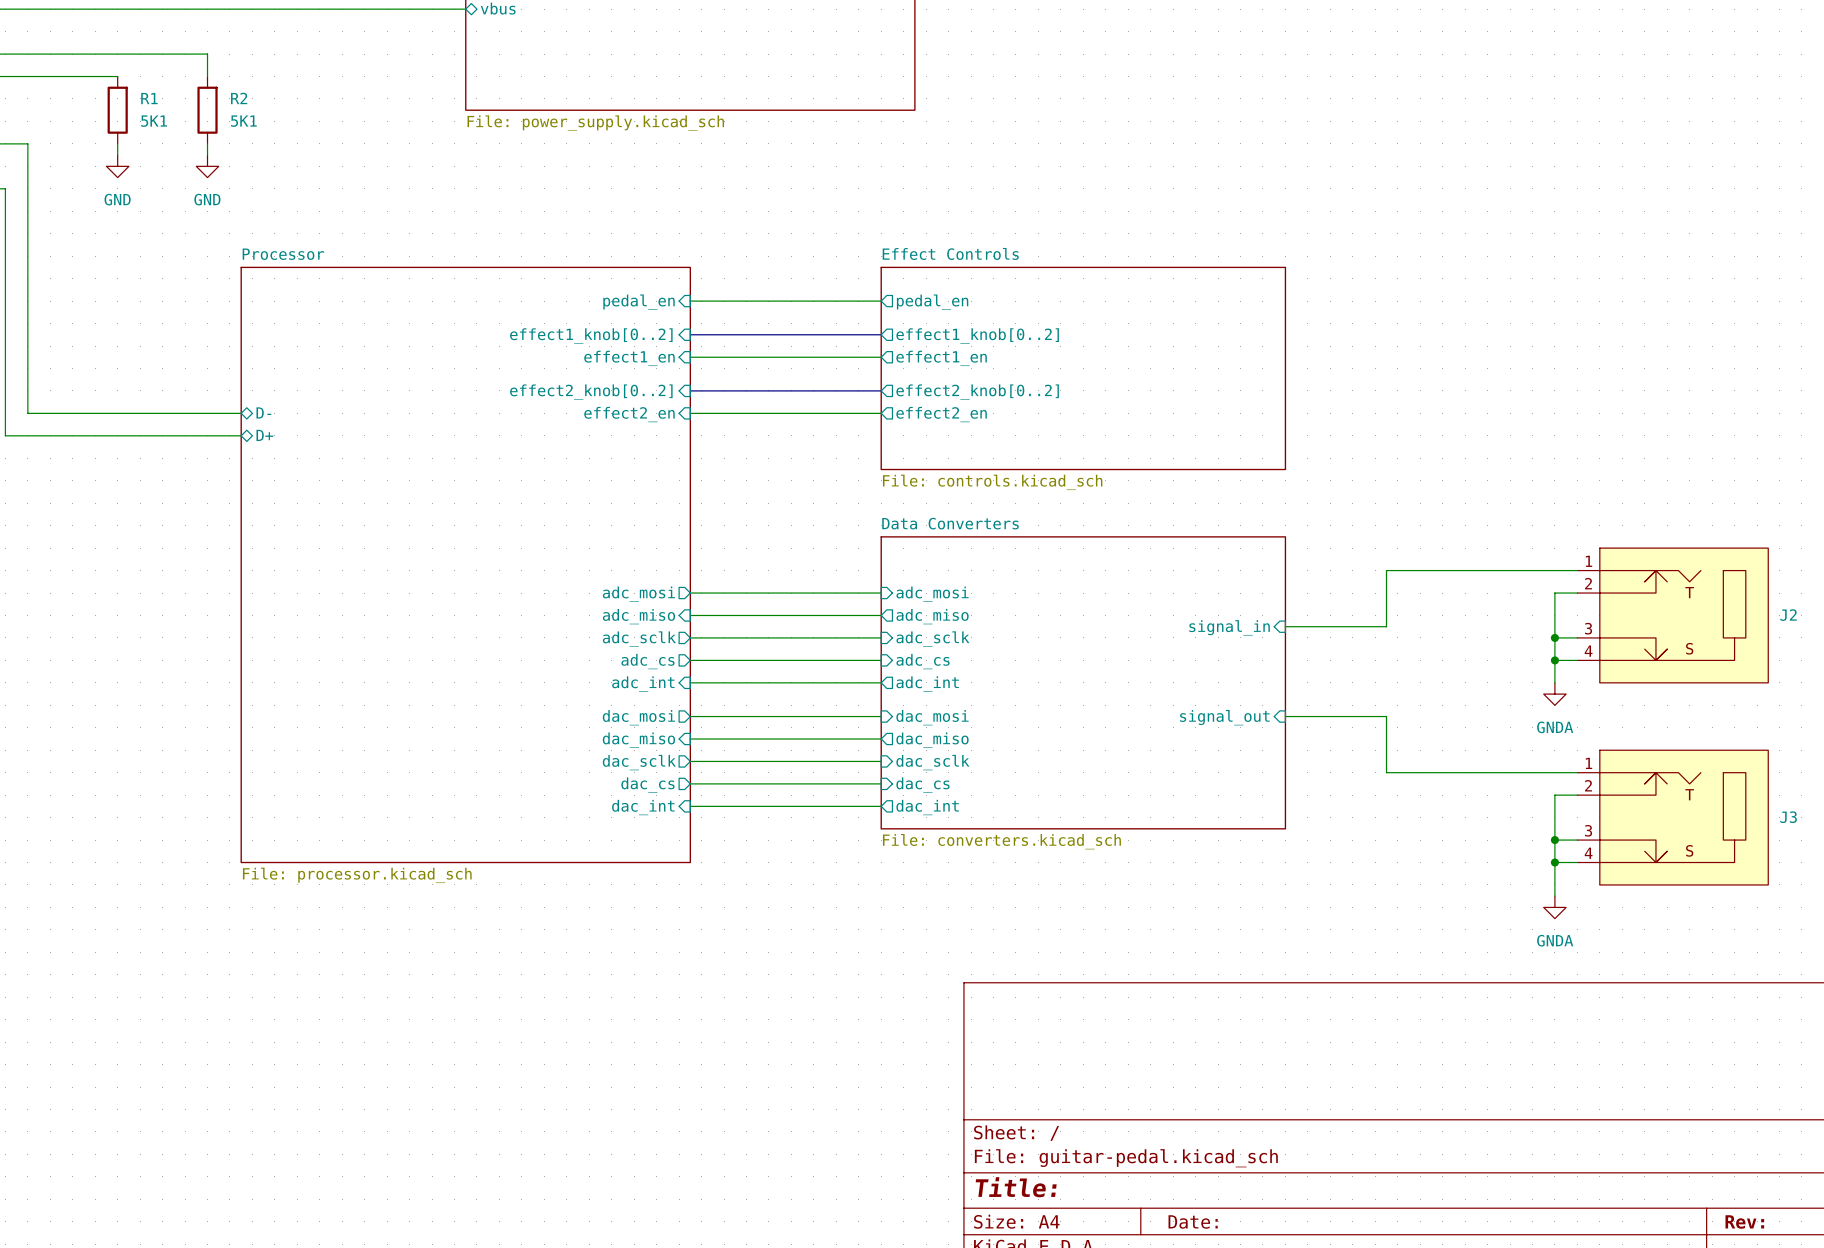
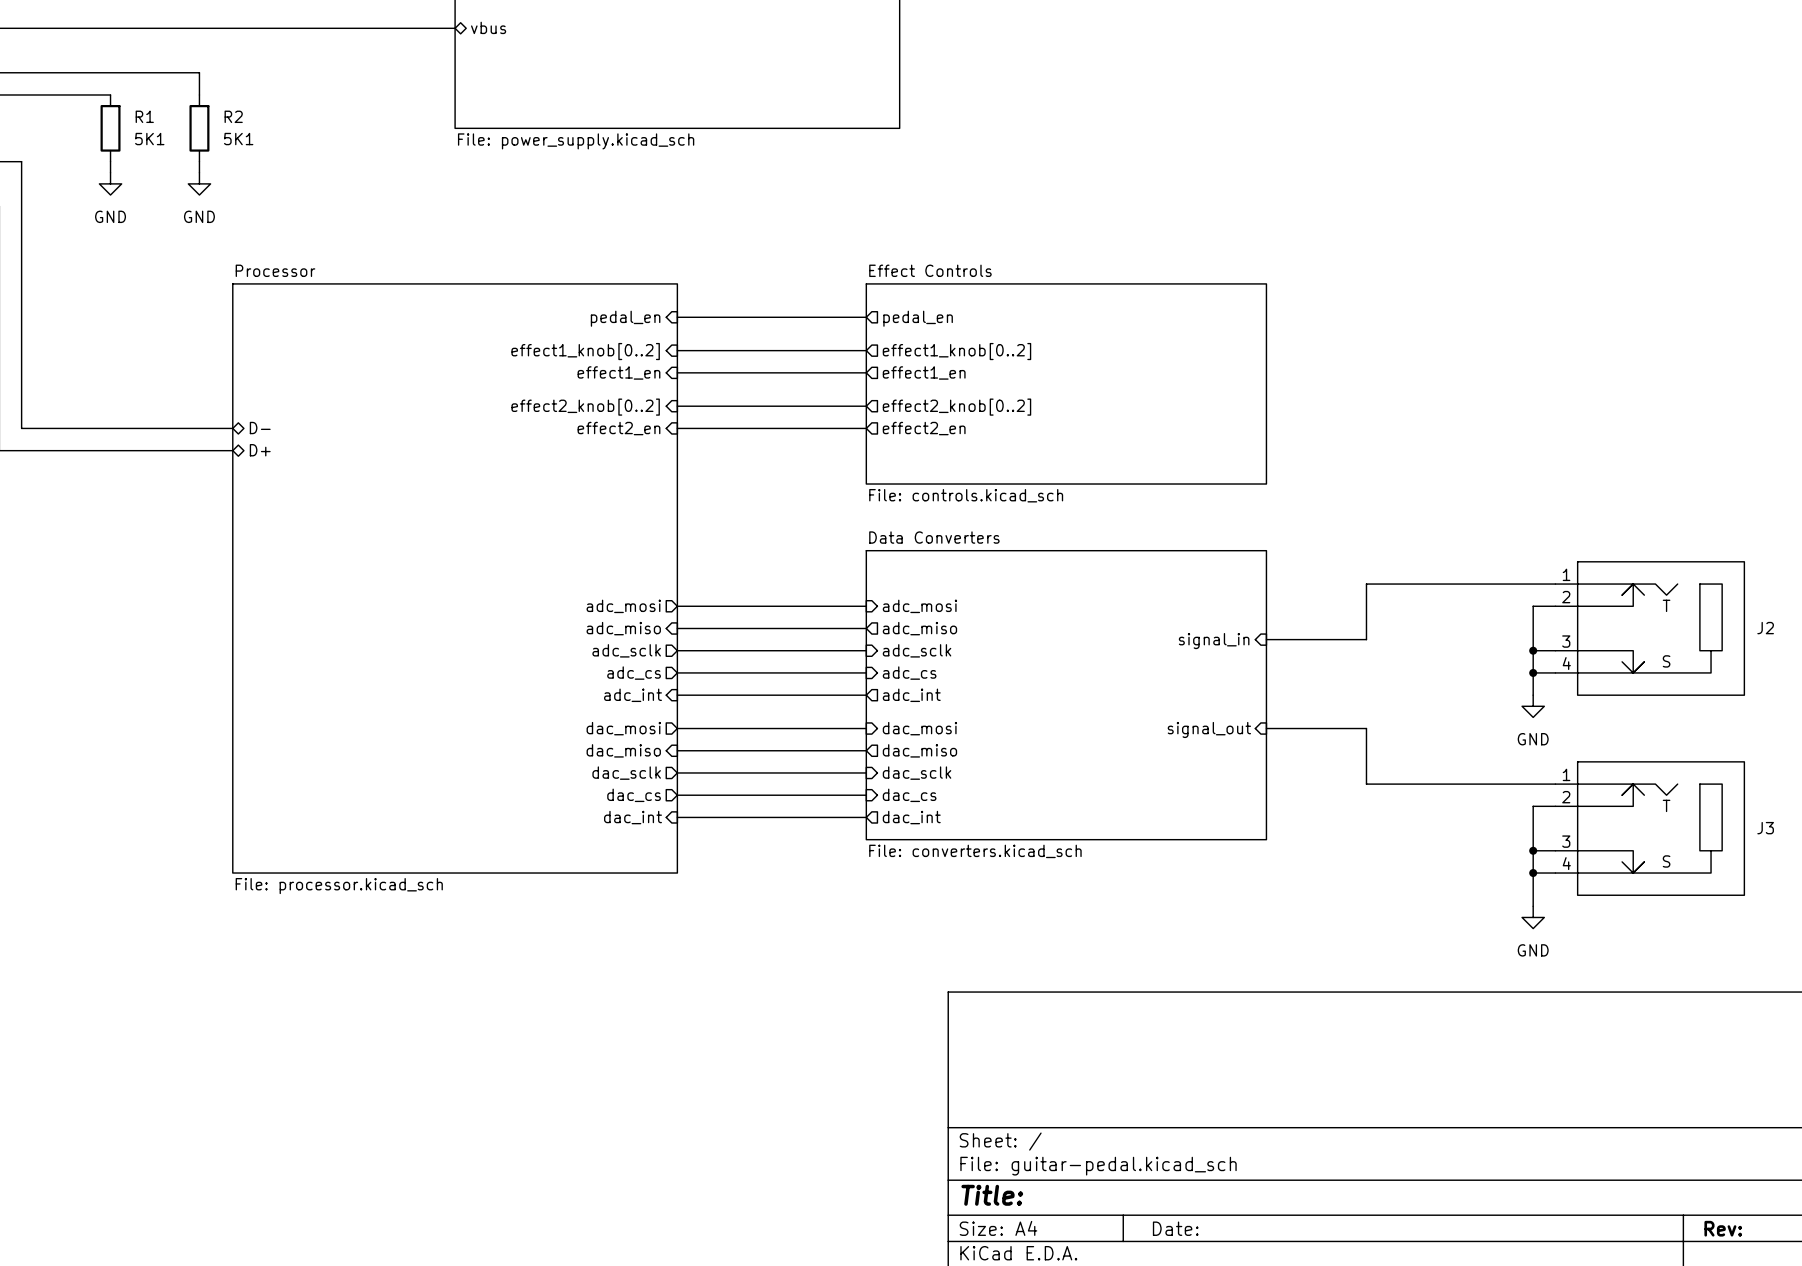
power symbol: GNDA (1554, 694) -> GND (1533, 706)
power symbol: GNDA (1554, 907) -> GND (1533, 917)

